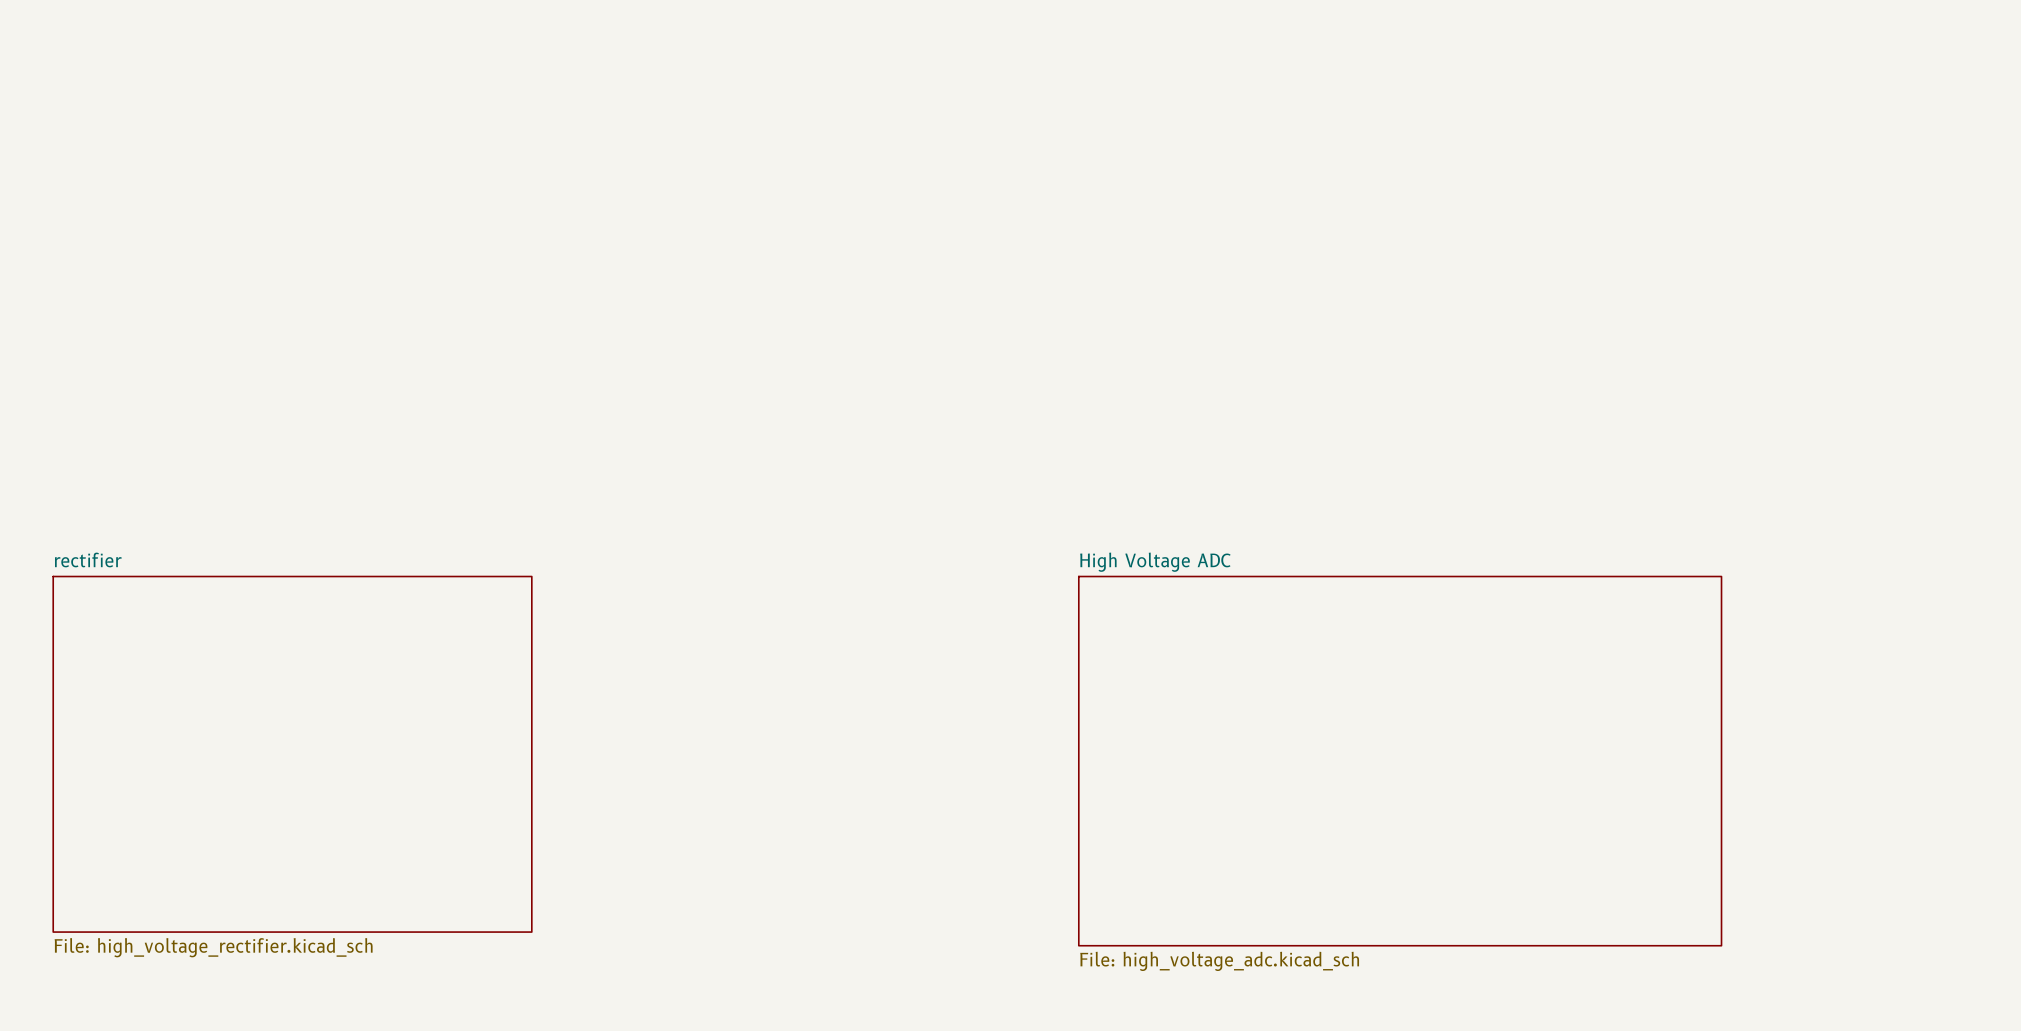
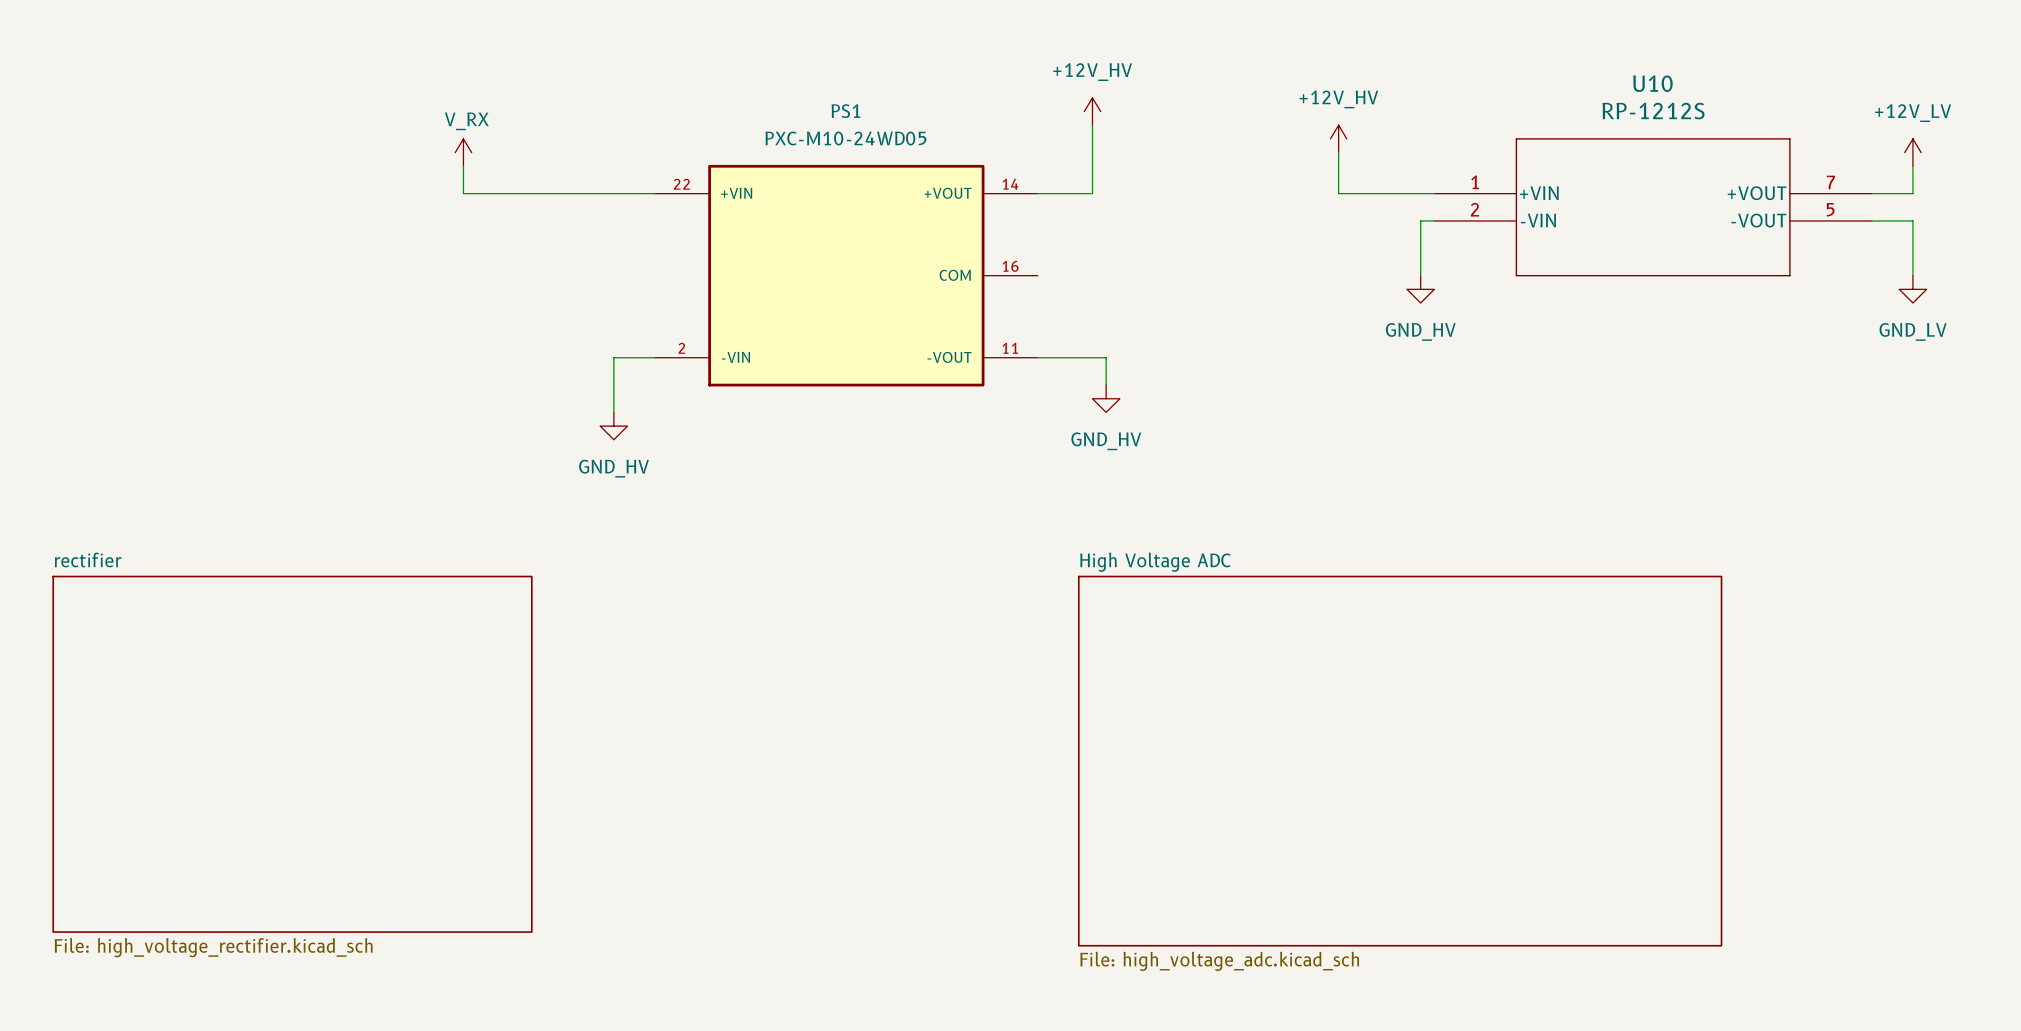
power symbol: none -> +12V_HV (1092, 111)
wire: none -> (1092, 125) (1092, 193) (1037, 193)
power symbol: none -> +12V_HV (1338, 138)
power symbol: none -> V_RX (463, 152)
wire: none -> (1338, 152) (1338, 193) (1434, 193)
power symbol: none -> +12V_LV (1912, 152)
wire: none -> (463, 166) (463, 193) (654, 193)
wire: none -> (1912, 166) (1912, 193) (1871, 193)
U10: none -> RP-1212S (1653, 207)
wire: none -> (1434, 220) (1420, 220) (1420, 275)
wire: none -> (1871, 220) (1912, 220) (1912, 275)
PS1: none -> PXC-M10-24WD05 (846, 275)
power symbol: none -> GND_HV (1420, 289)
power symbol: none -> GND_LV (1912, 289)
wire: none -> (654, 357) (613, 357) (613, 412)
wire: none -> (1037, 357) (1106, 357) (1106, 385)
power symbol: none -> GND_HV (1106, 398)
power symbol: none -> GND_HV (613, 426)

